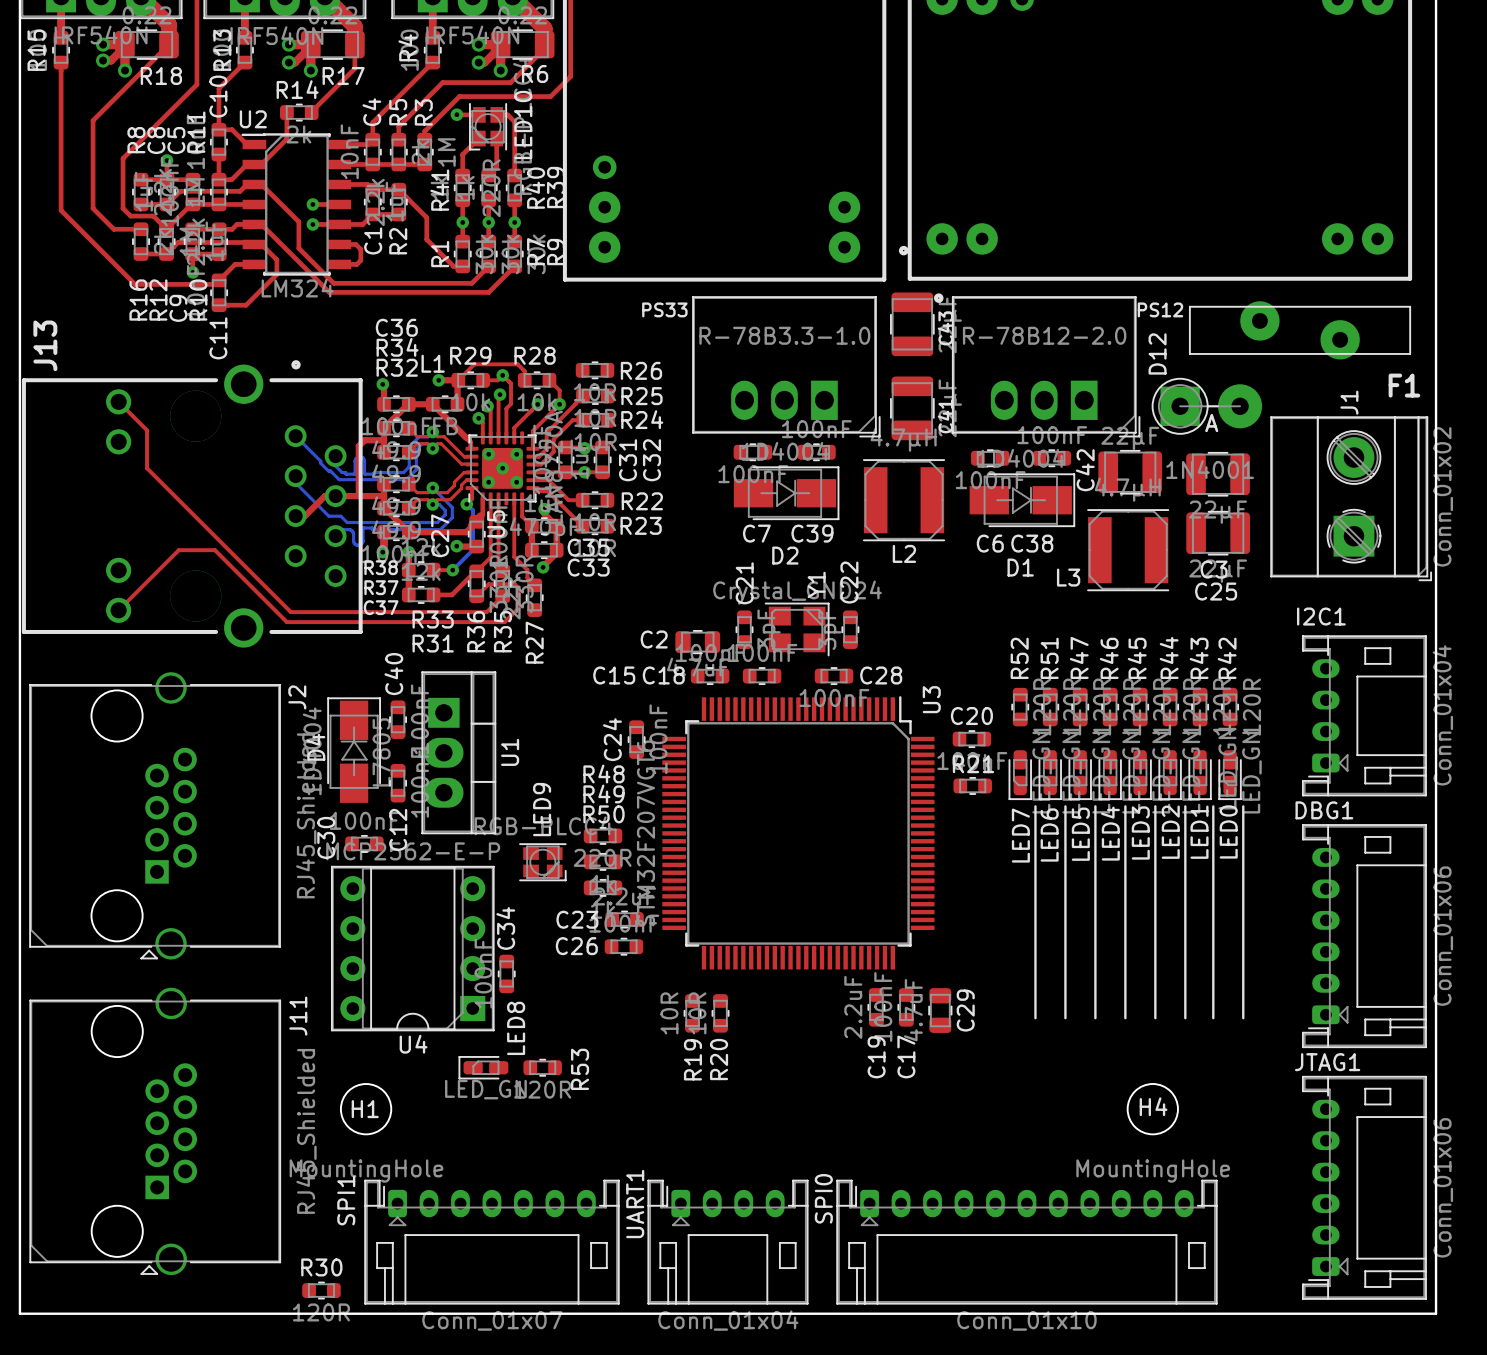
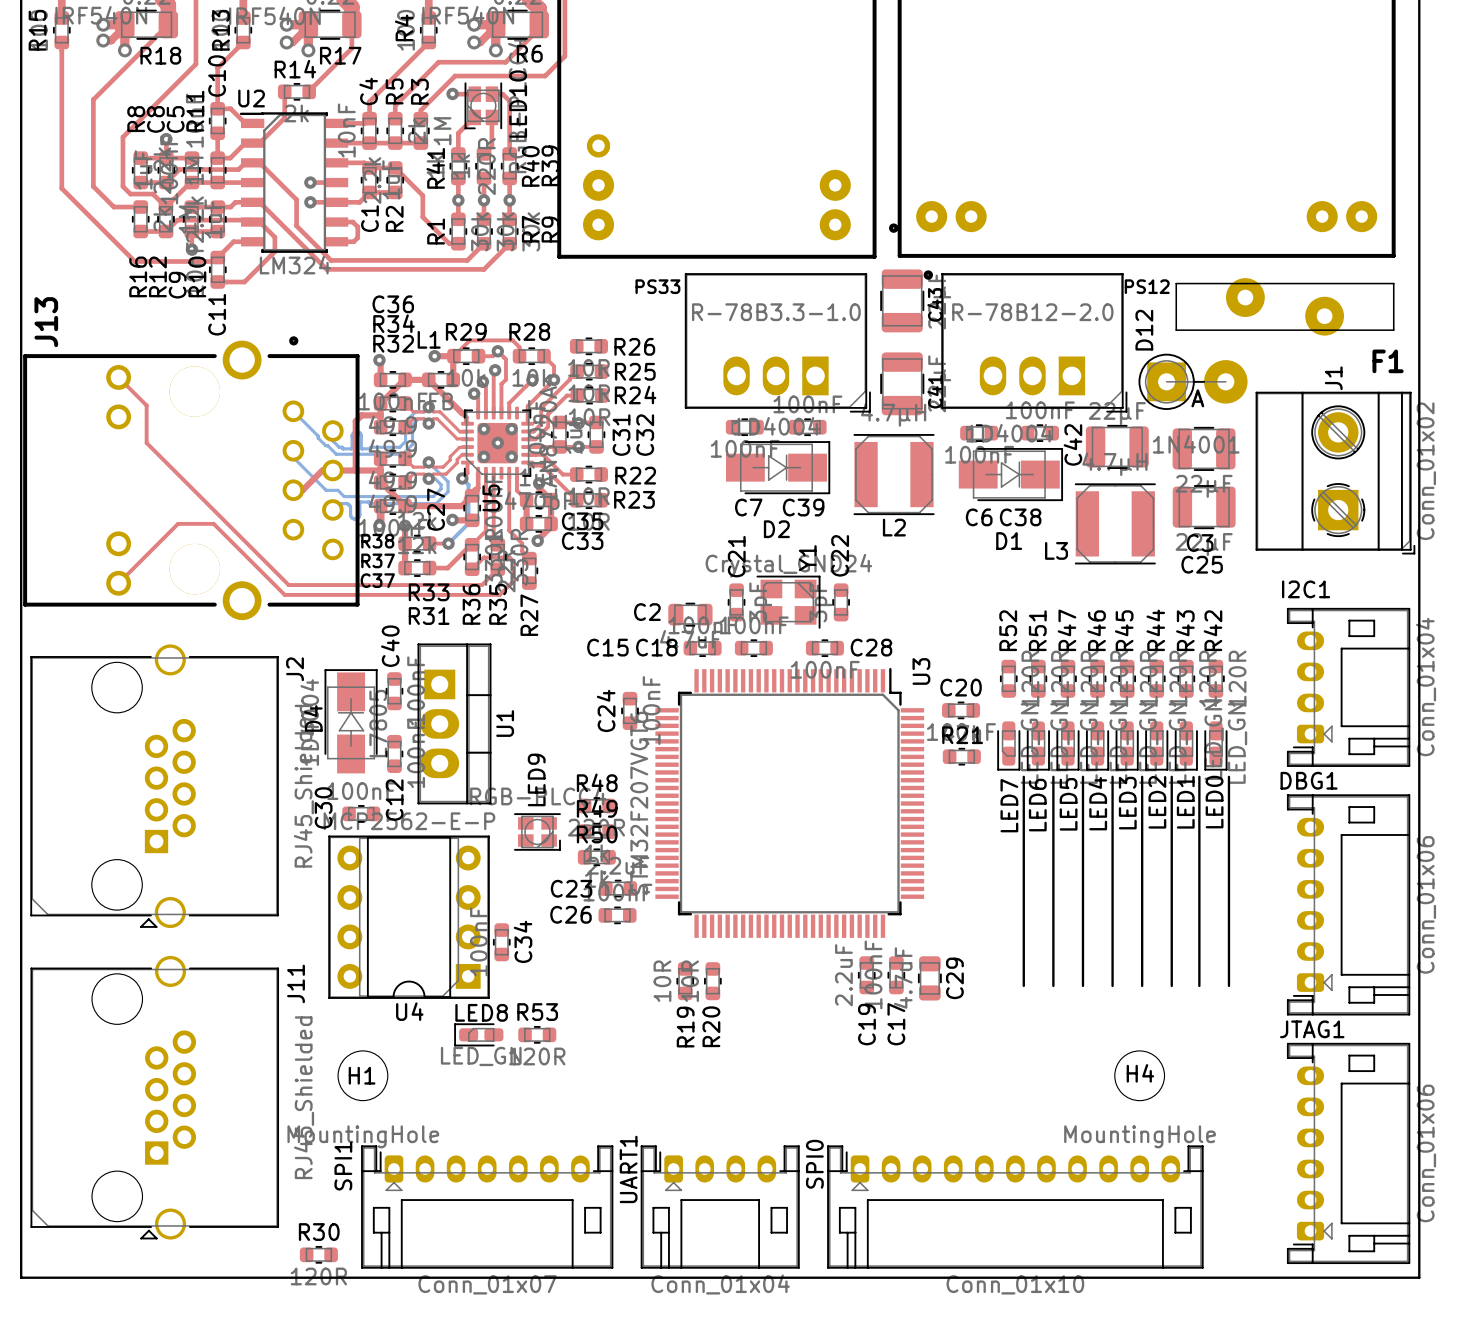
R48 name position: R48 (604, 774) -> R48 (597, 782)
R49 name position: R49 (604, 794) -> R49 (597, 808)
R50 name position: R50 (604, 814) -> R50 (597, 834)
C34 name position: C34 (505, 928) -> C34 (523, 941)
LED8 name rotation: 0° (516, 1028) -> 90° clockwise (481, 1012)
R53 name rotation: 0° (580, 1069) -> 90° clockwise (537, 1012)

